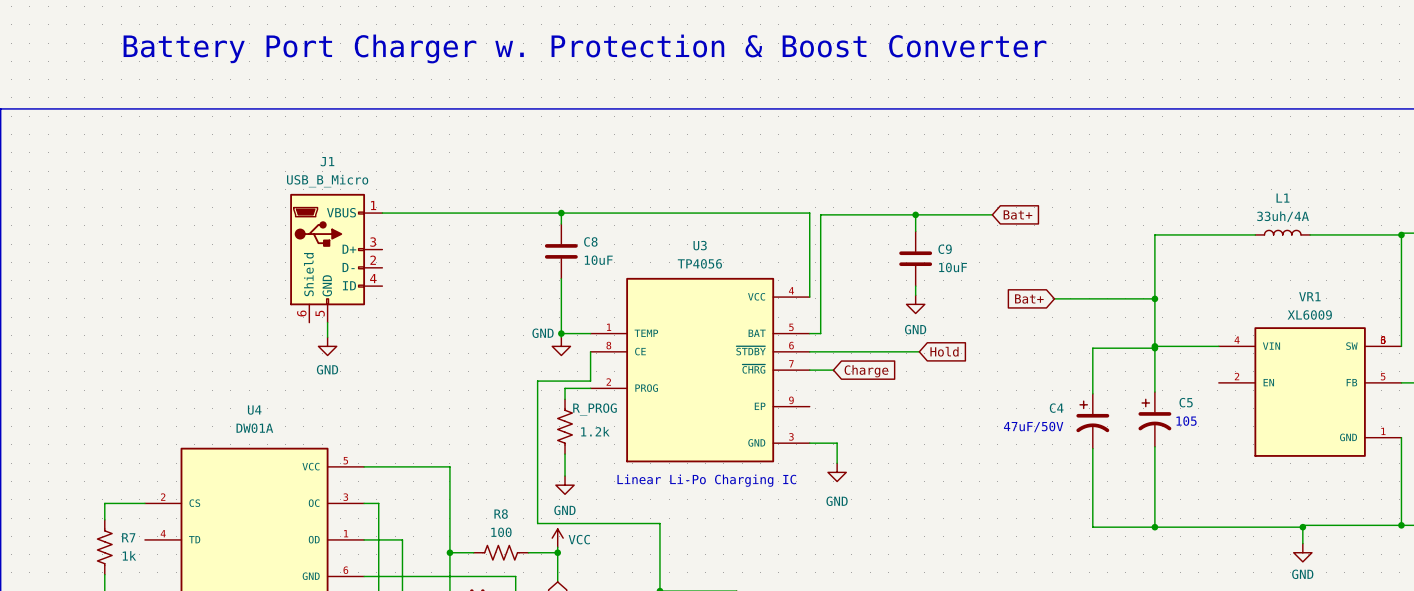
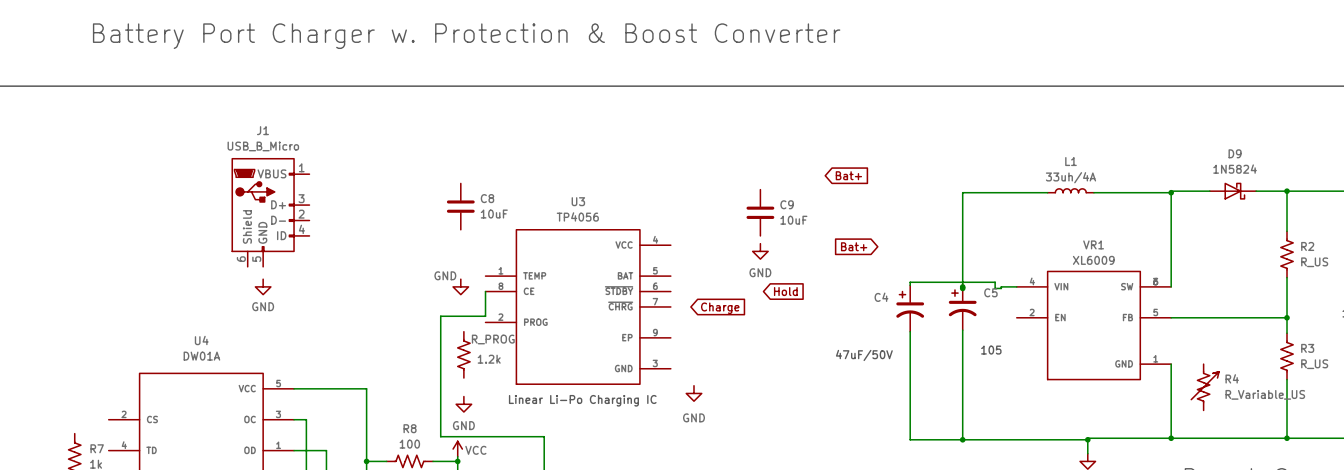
wire: (382, 213) (809, 213) (809, 297) -> none
wire: (561, 213) (561, 224) -> none
junction: (561, 213) -> none
wire: (915, 214) (915, 231) -> none
junction: (915, 214) -> none
wire: (992, 214) (820, 214) (820, 333) (809, 333) -> none
wire: (561, 278) (561, 337) -> none
wire: (915, 286) (915, 295) -> none
wire: (1054, 298) (1154, 298) -> none
junction: (1154, 298) -> none
wire: (327, 322) (327, 337) -> none
wire: (561, 333) (590, 333) -> none
junction: (561, 333) -> none
wire: (1154, 346) (1200, 346) -> (910, 285) (910, 282) (995, 282) (995, 288) (1001, 286)
wire: (1154, 348) (1092, 348) (1092, 393) -> none
wire: (809, 351) (919, 351) -> none
wire: (809, 370) (833, 370) -> none
wire: (590, 388) (565, 388) (565, 399) -> none
C5 position: (1154, 419) -> (962, 306)
C4 position: (1092, 421) -> (910, 308)
wire: (809, 443) (837, 443) (837, 463) -> none
wire: (565, 454) (565, 476) -> none
wire: (144, 503) (104, 503) (104, 519) -> none

